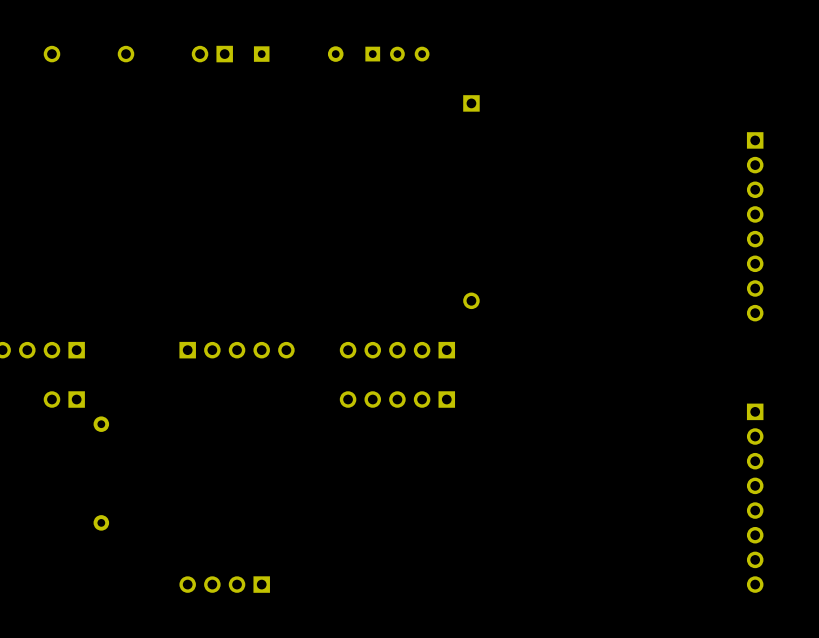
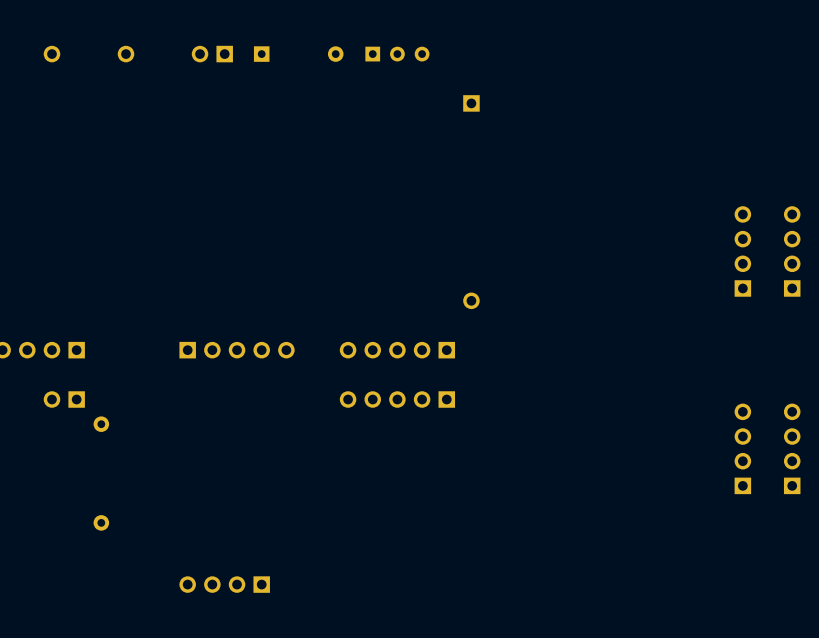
part: (755, 226) -> none
part: none -> (742, 251)
part: none -> (792, 251)
part: none -> (742, 448)
part: none -> (792, 448)
part: (755, 498) -> none

